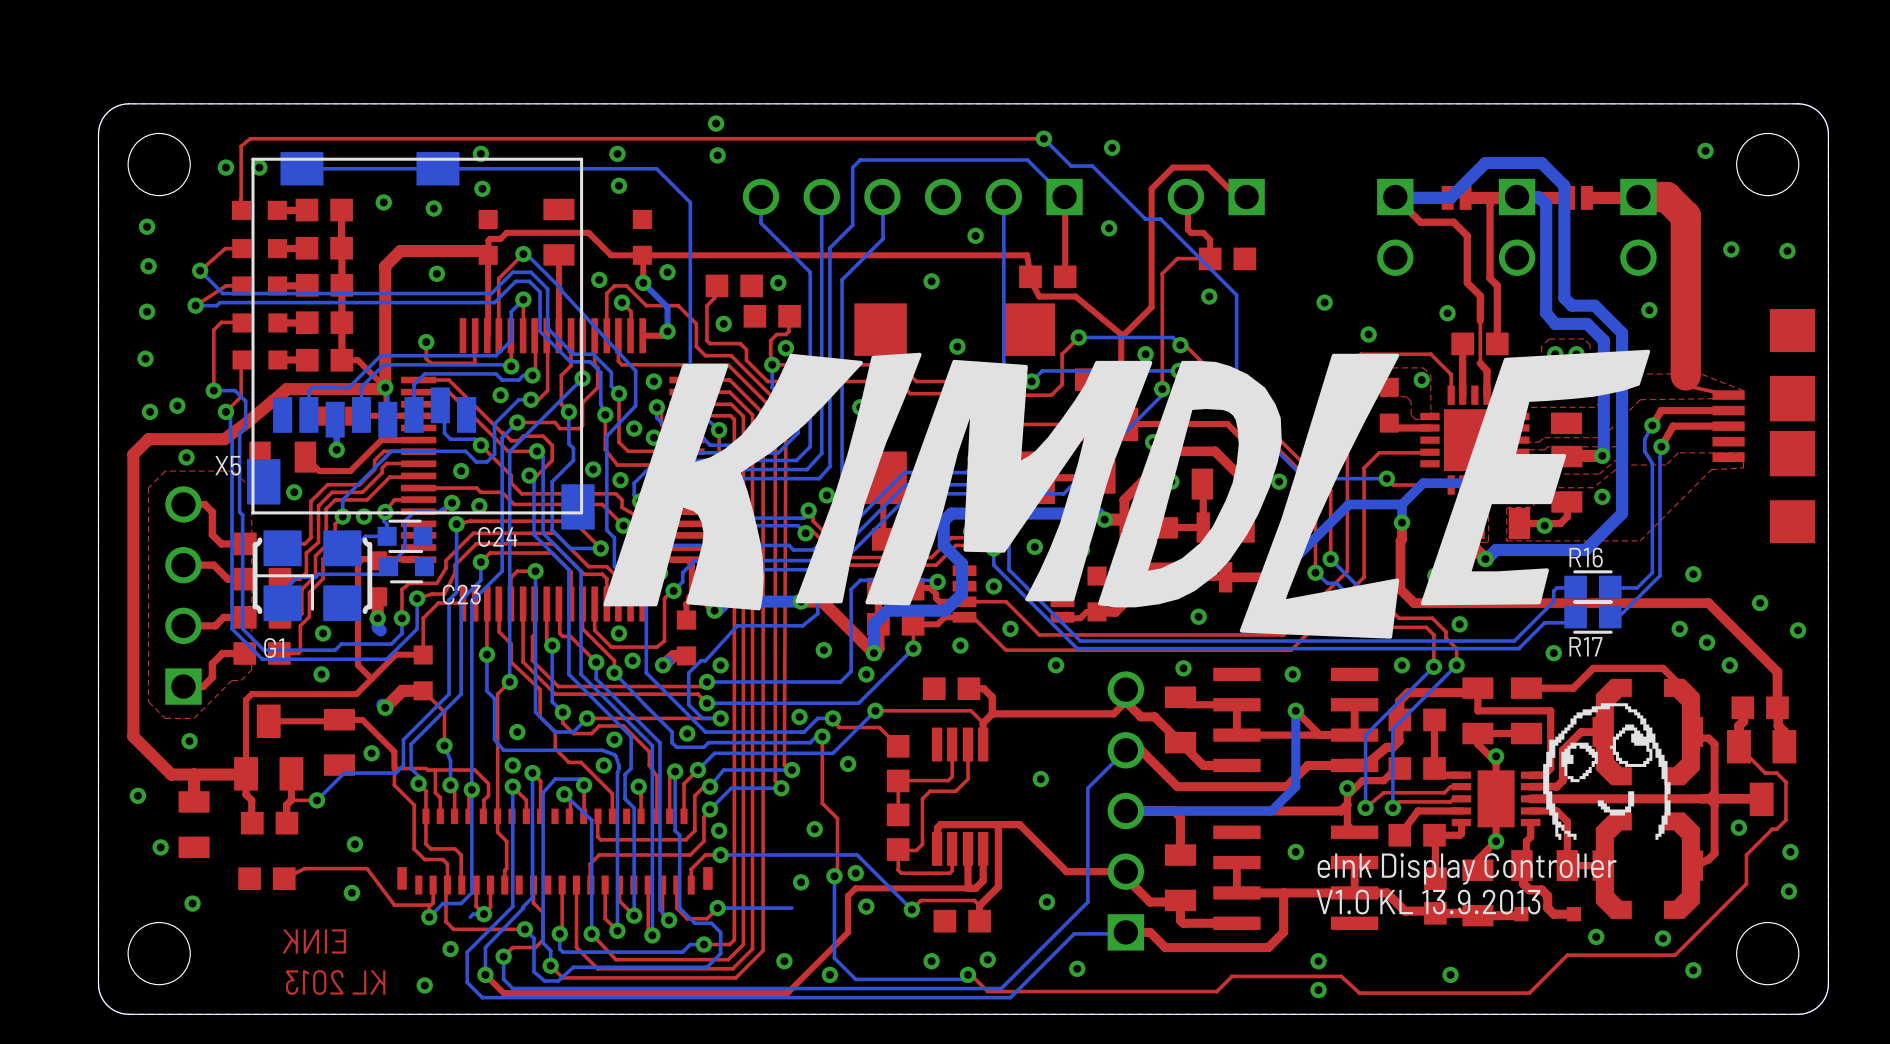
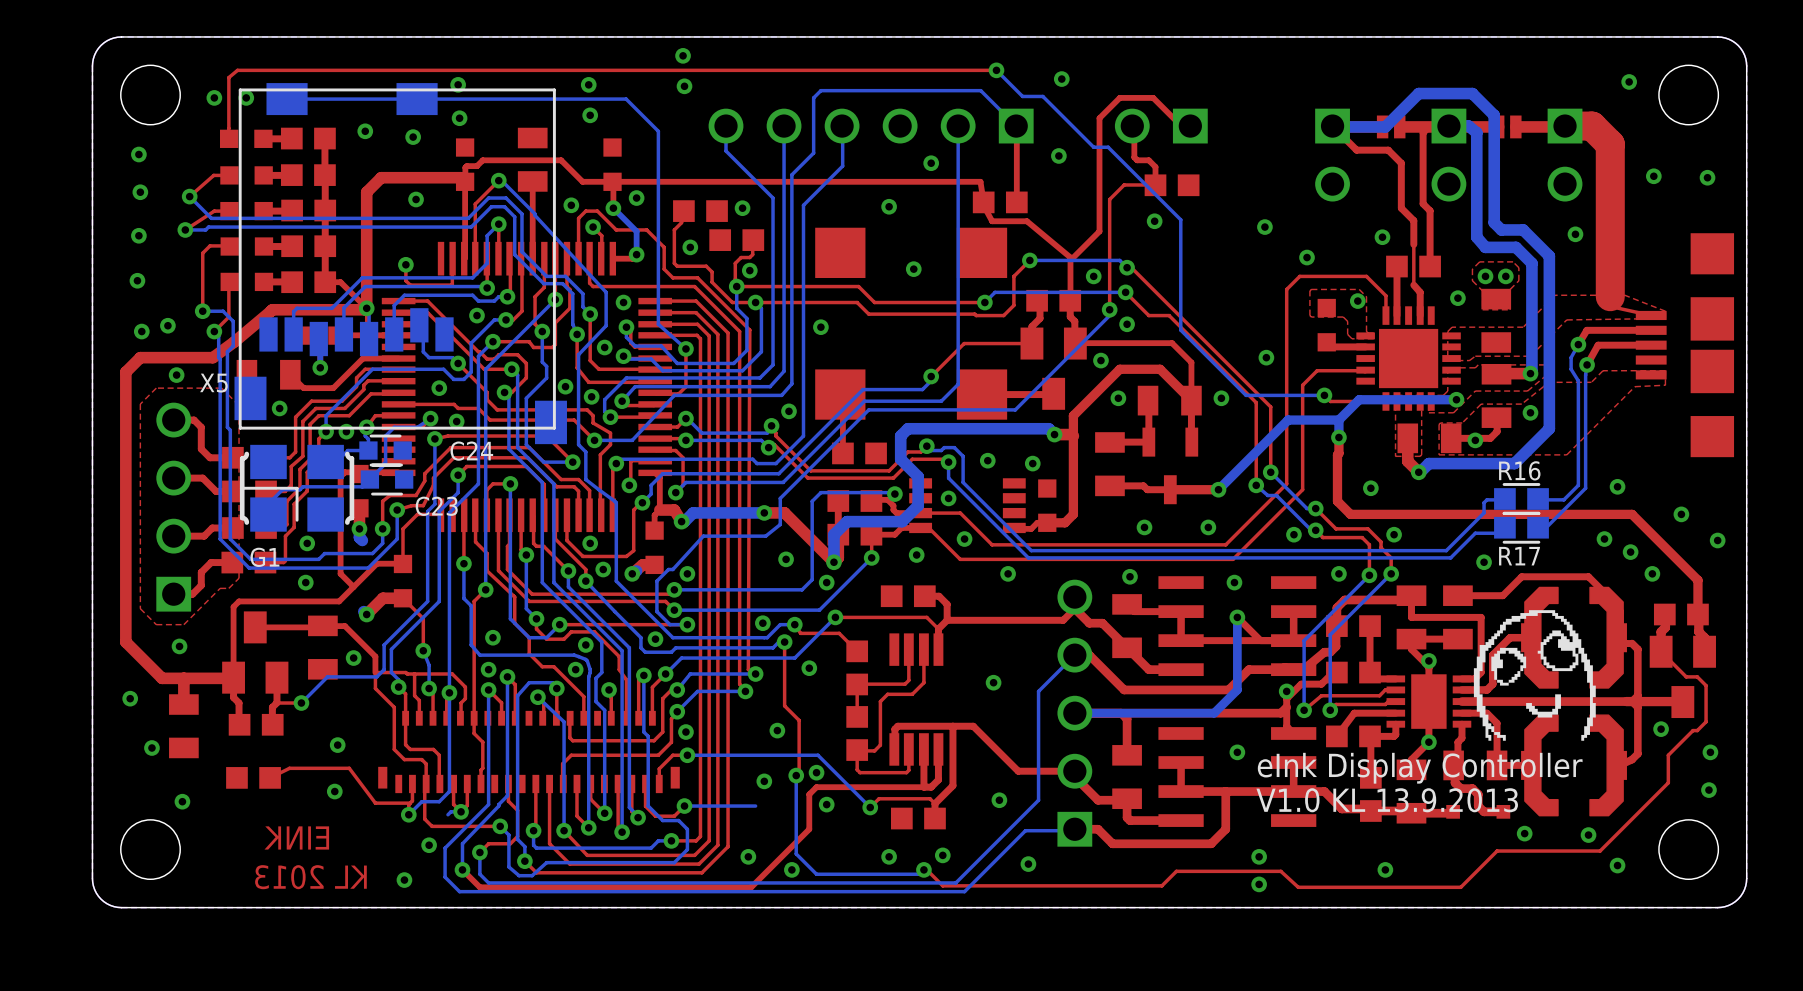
drawing: [603, 349, 1651, 639] -> none

